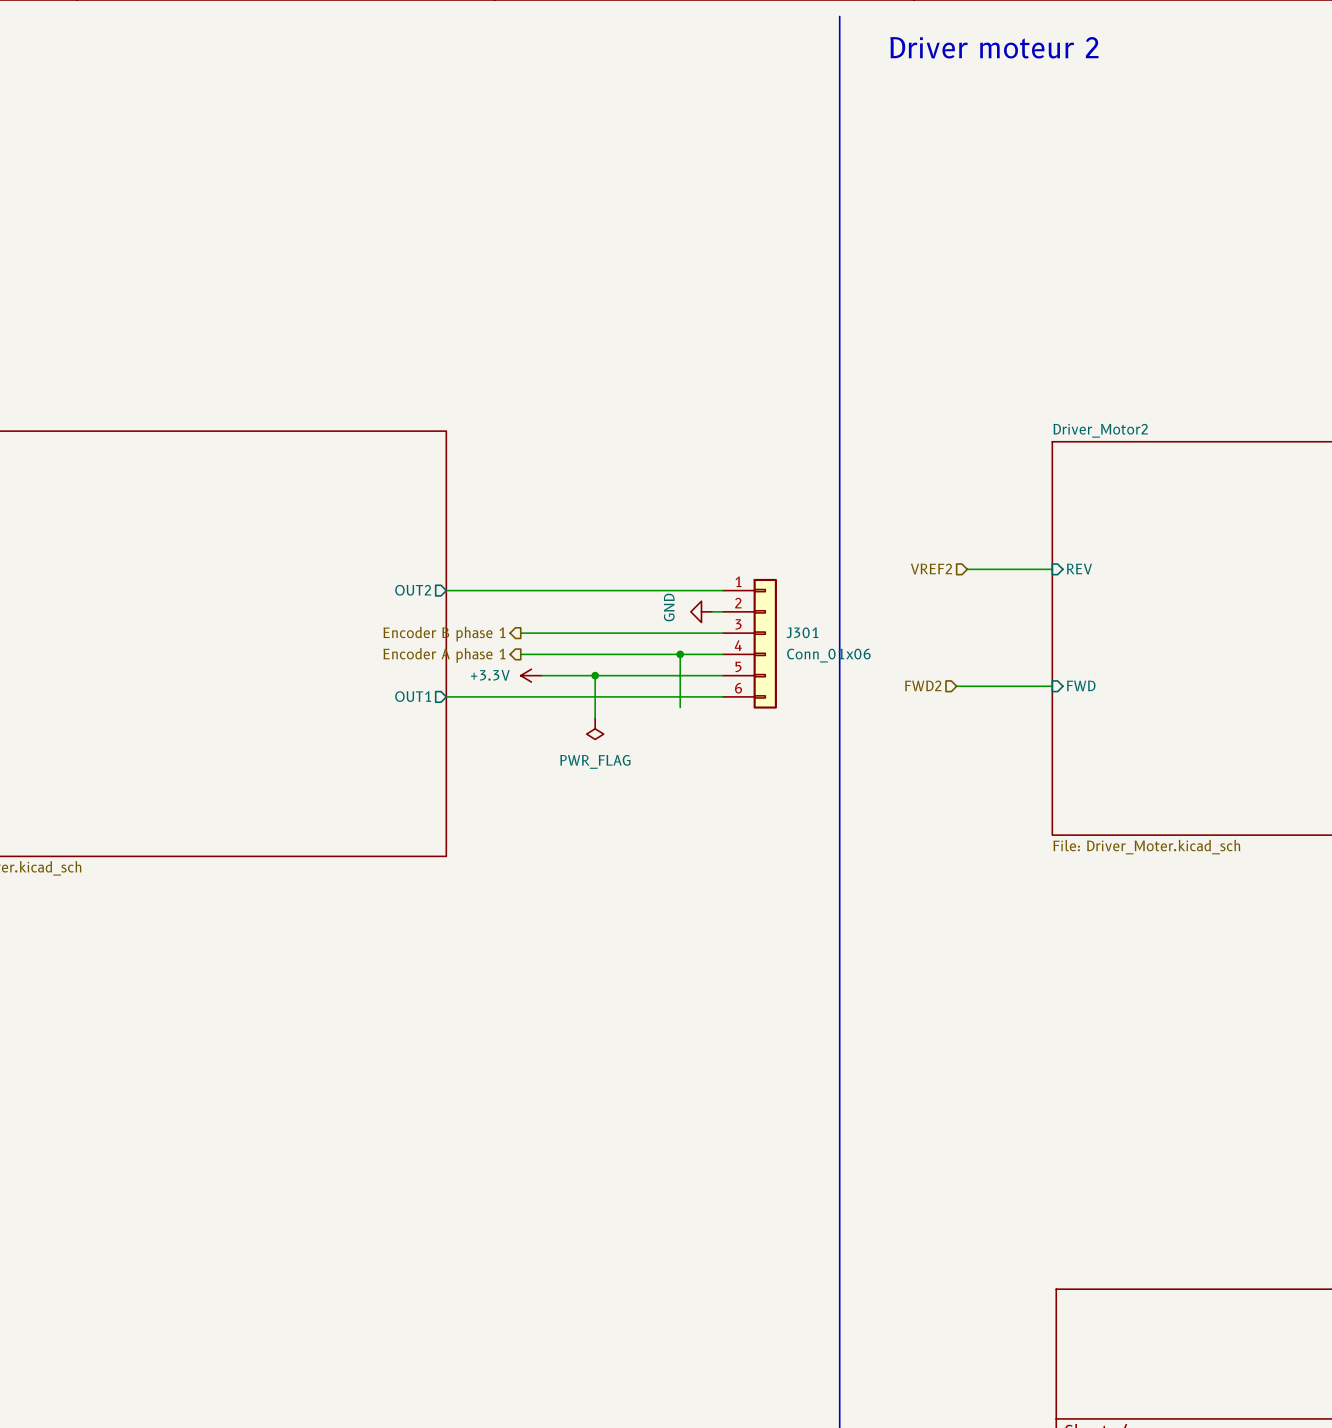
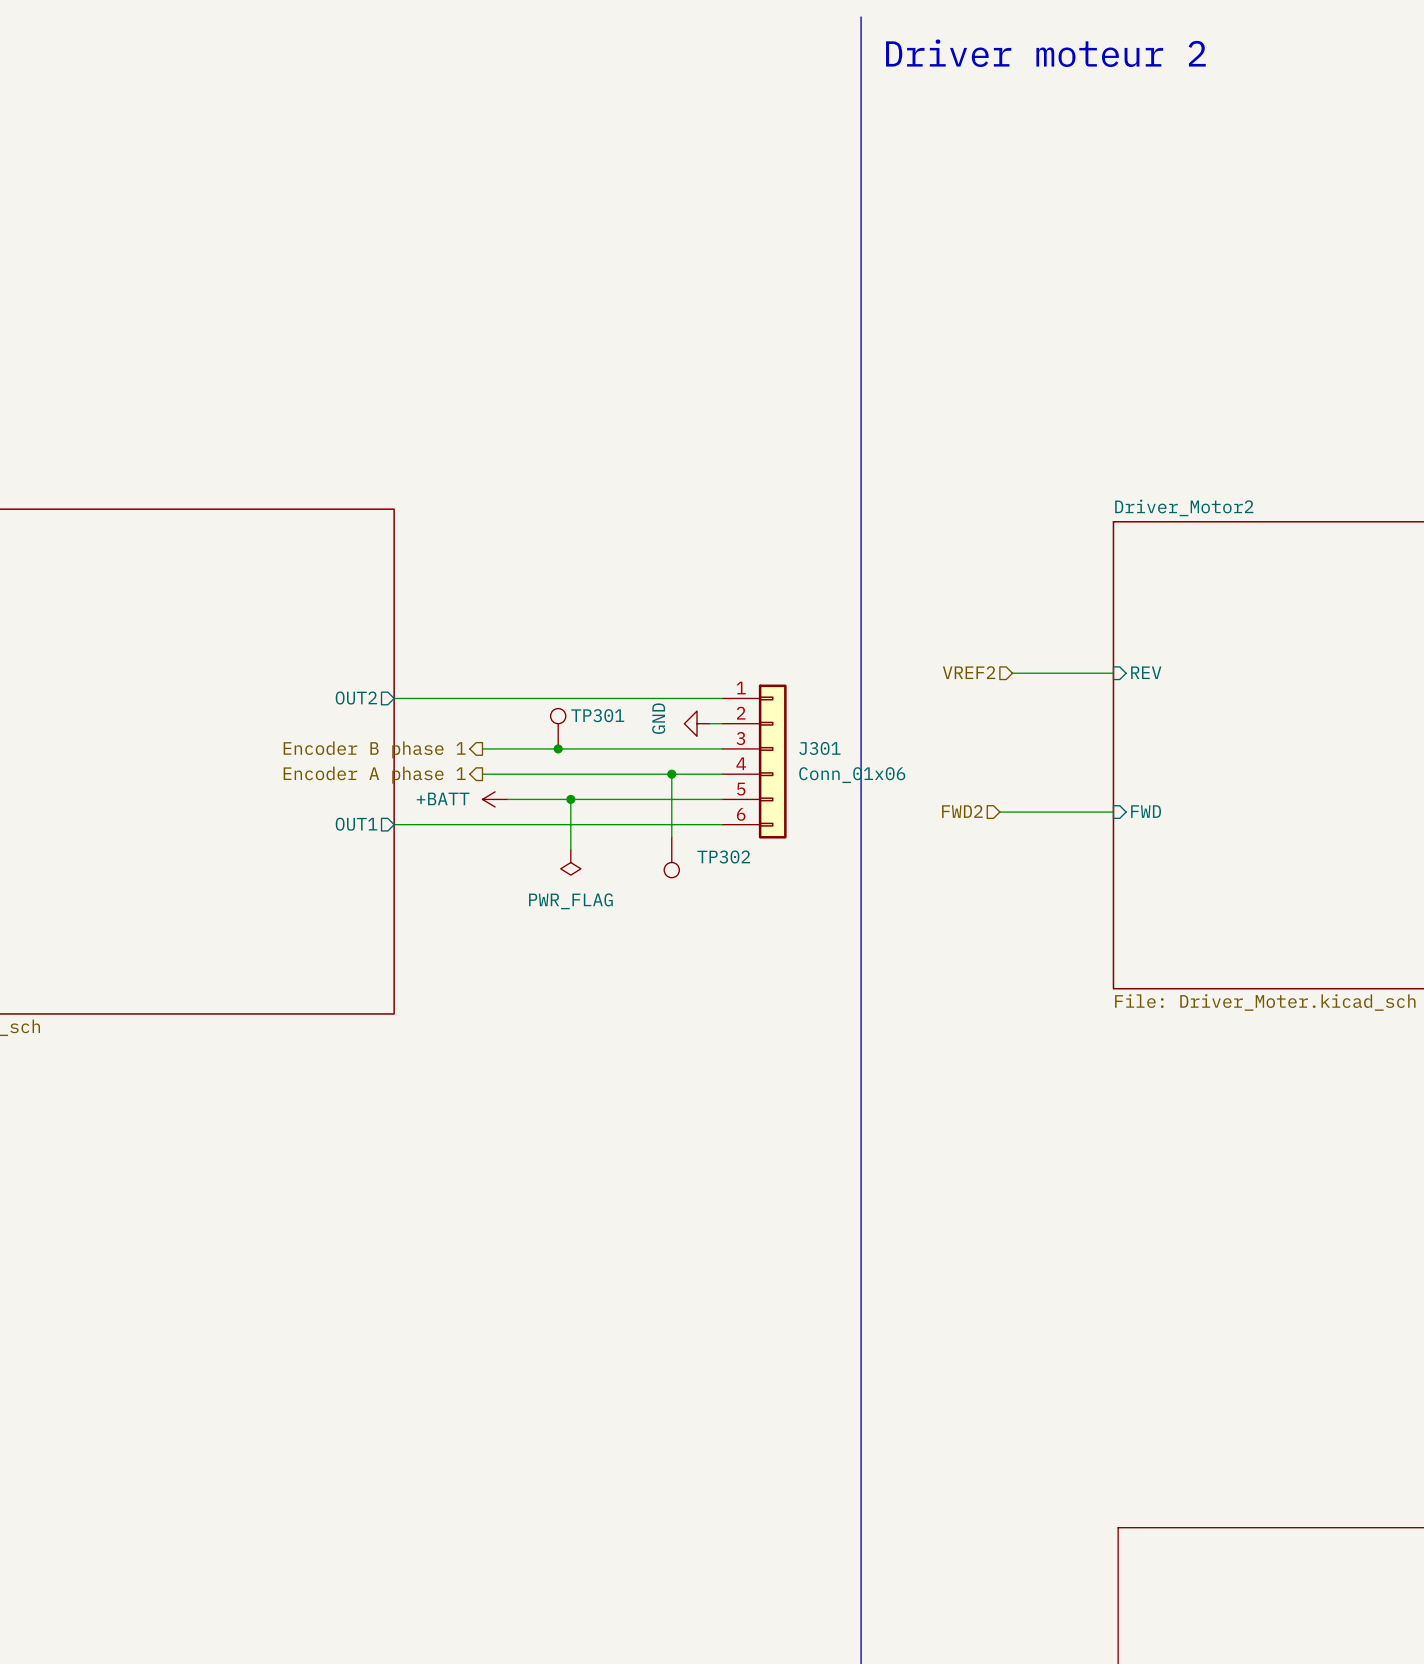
TP301: none -> (558, 728)
junction: none -> (558, 748)
power symbol: +3.3V (531, 675) -> +BATT (495, 799)
TP302: none -> (671, 857)

